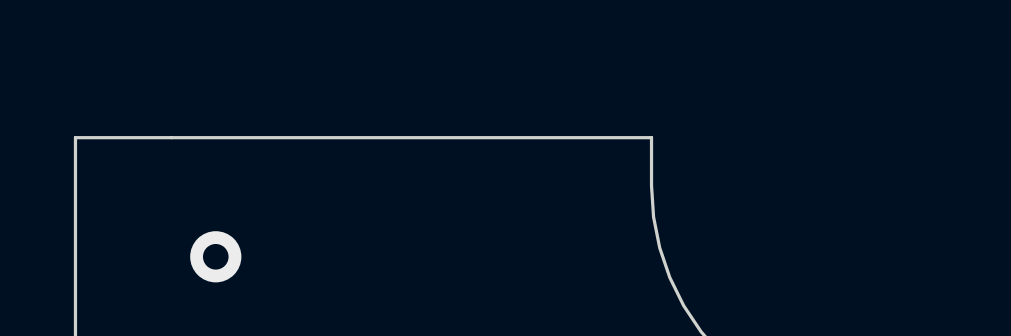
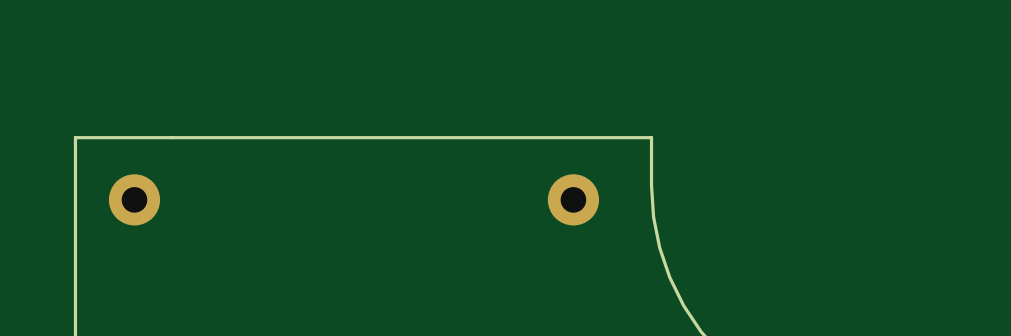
via: none -> (573, 199)
via position: (215, 256) -> (134, 199)

